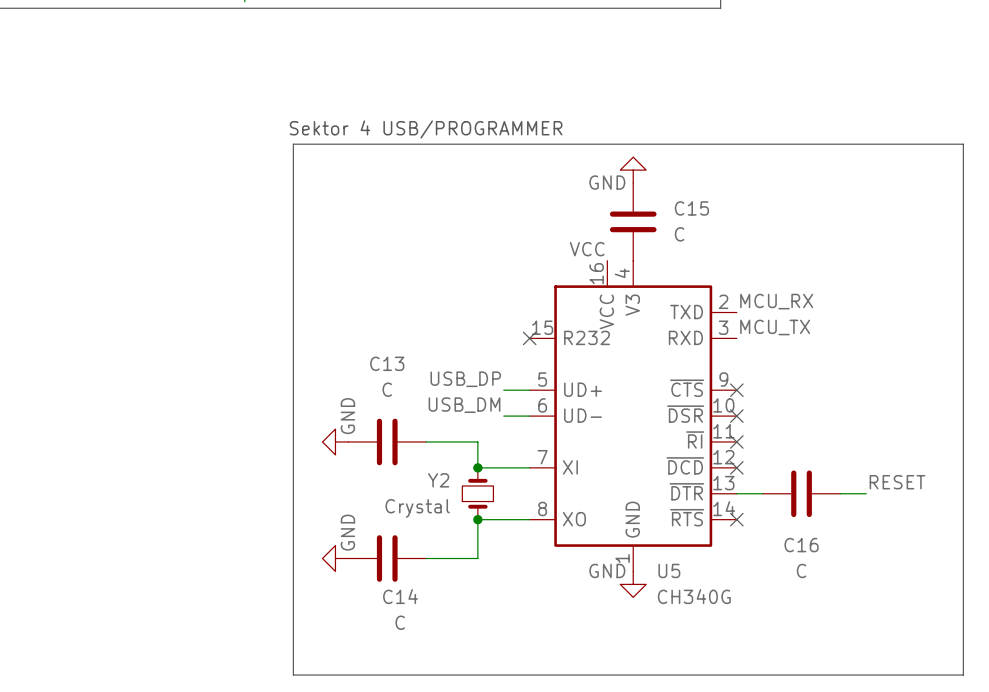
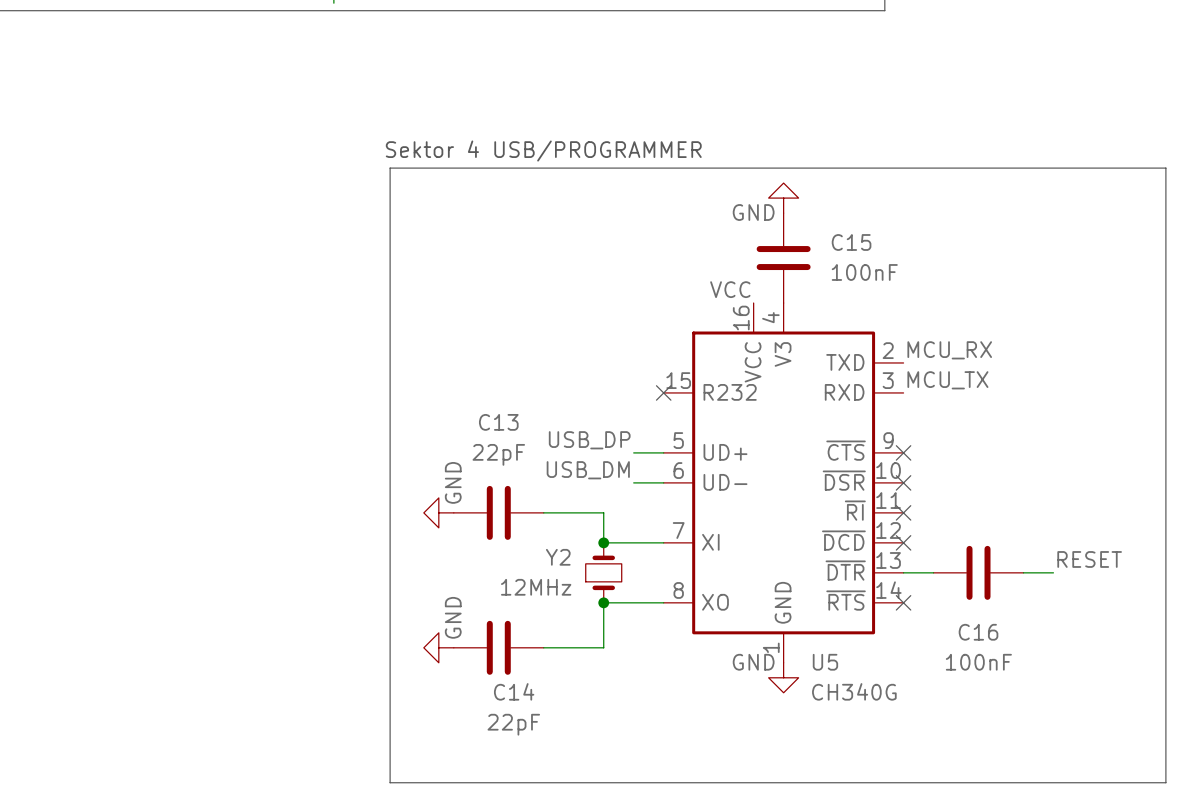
C15 value: C (679, 234) -> 100nF (864, 272)
C13 value: C (387, 389) -> 22pF (498, 454)
Y2 value: Crystal (417, 508) -> 12MHz (536, 587)
C16 value: C (801, 570) -> 100nF (978, 662)
C14 value: C (400, 622) -> 22pF (513, 724)

